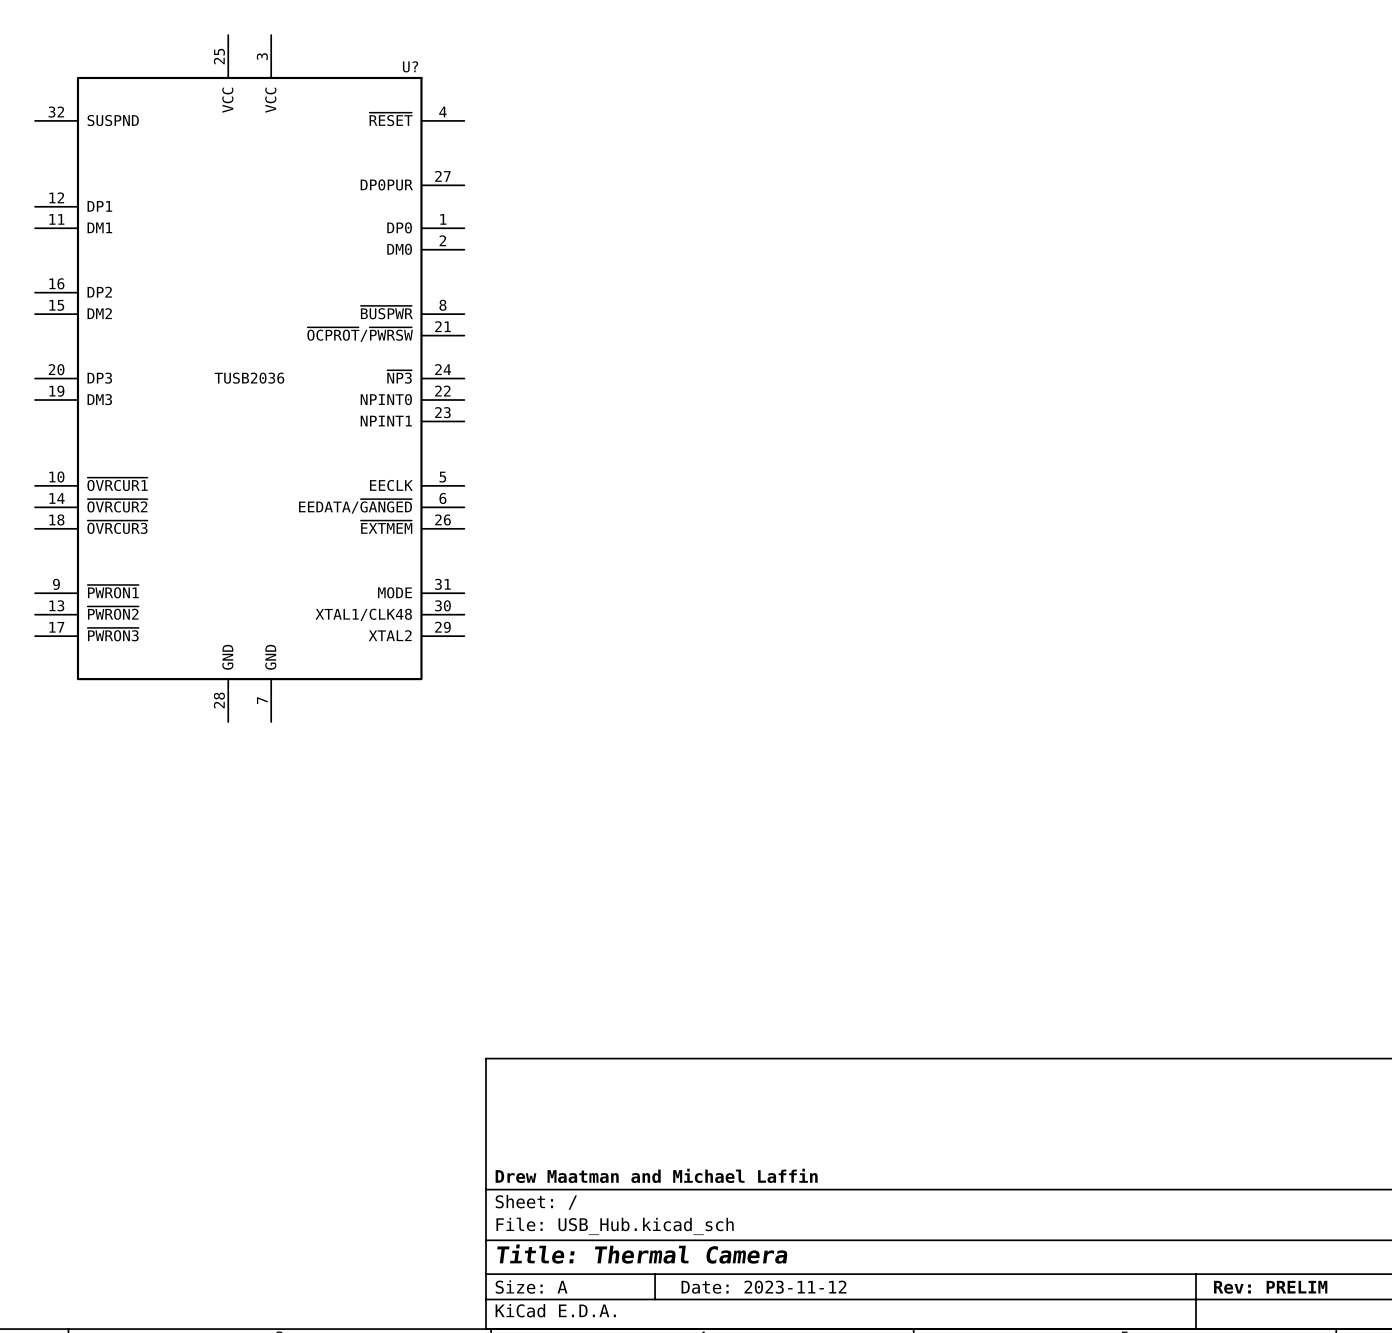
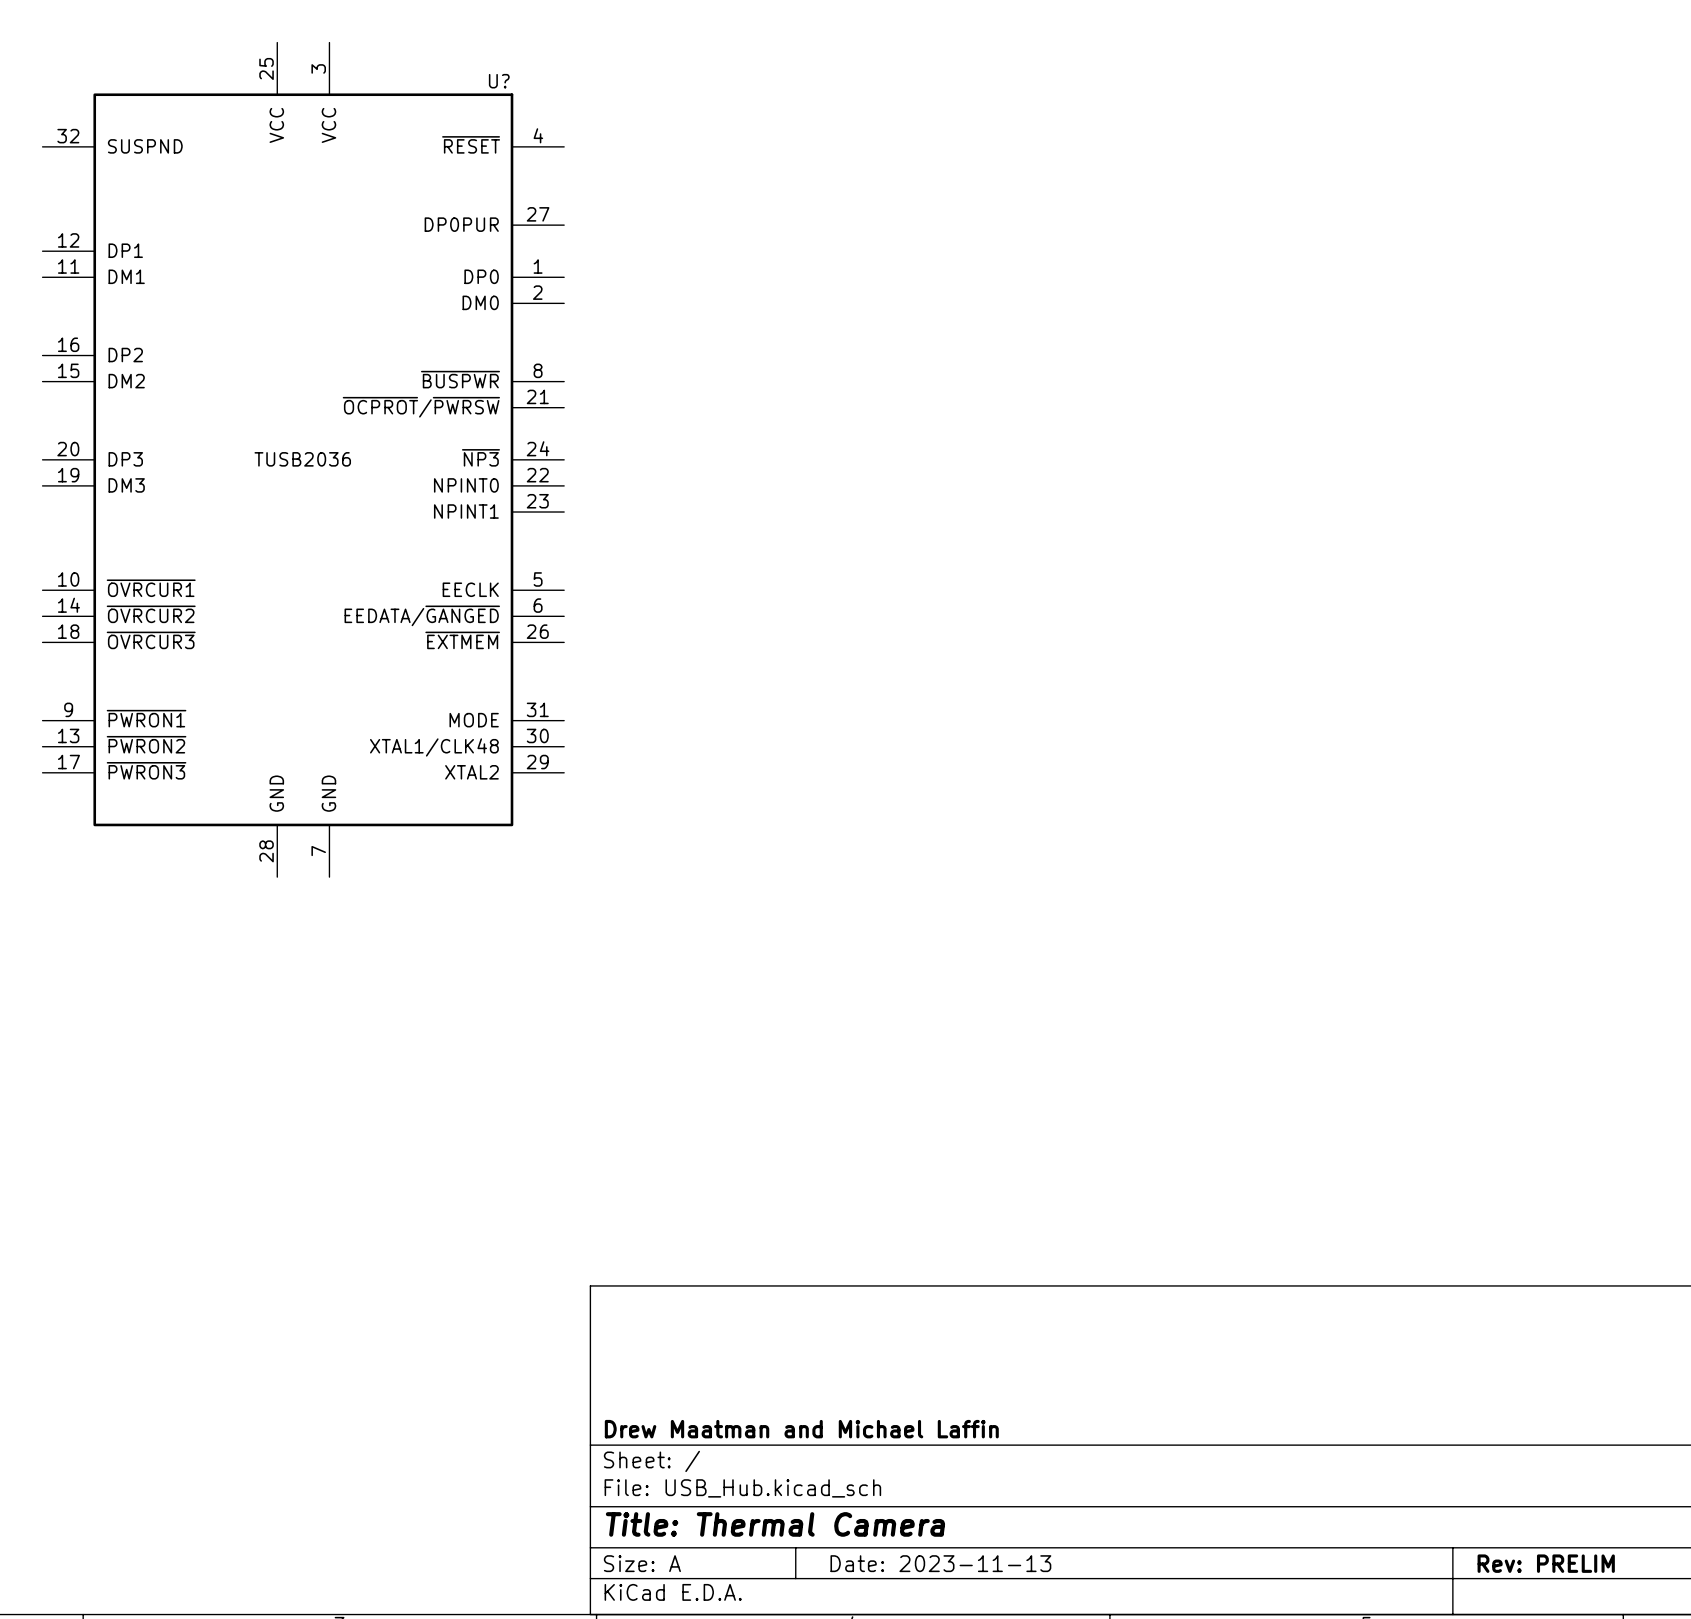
title block: Date: 2023-11-12 (764, 1287) -> Date: 2023-11-13 (940, 1563)

